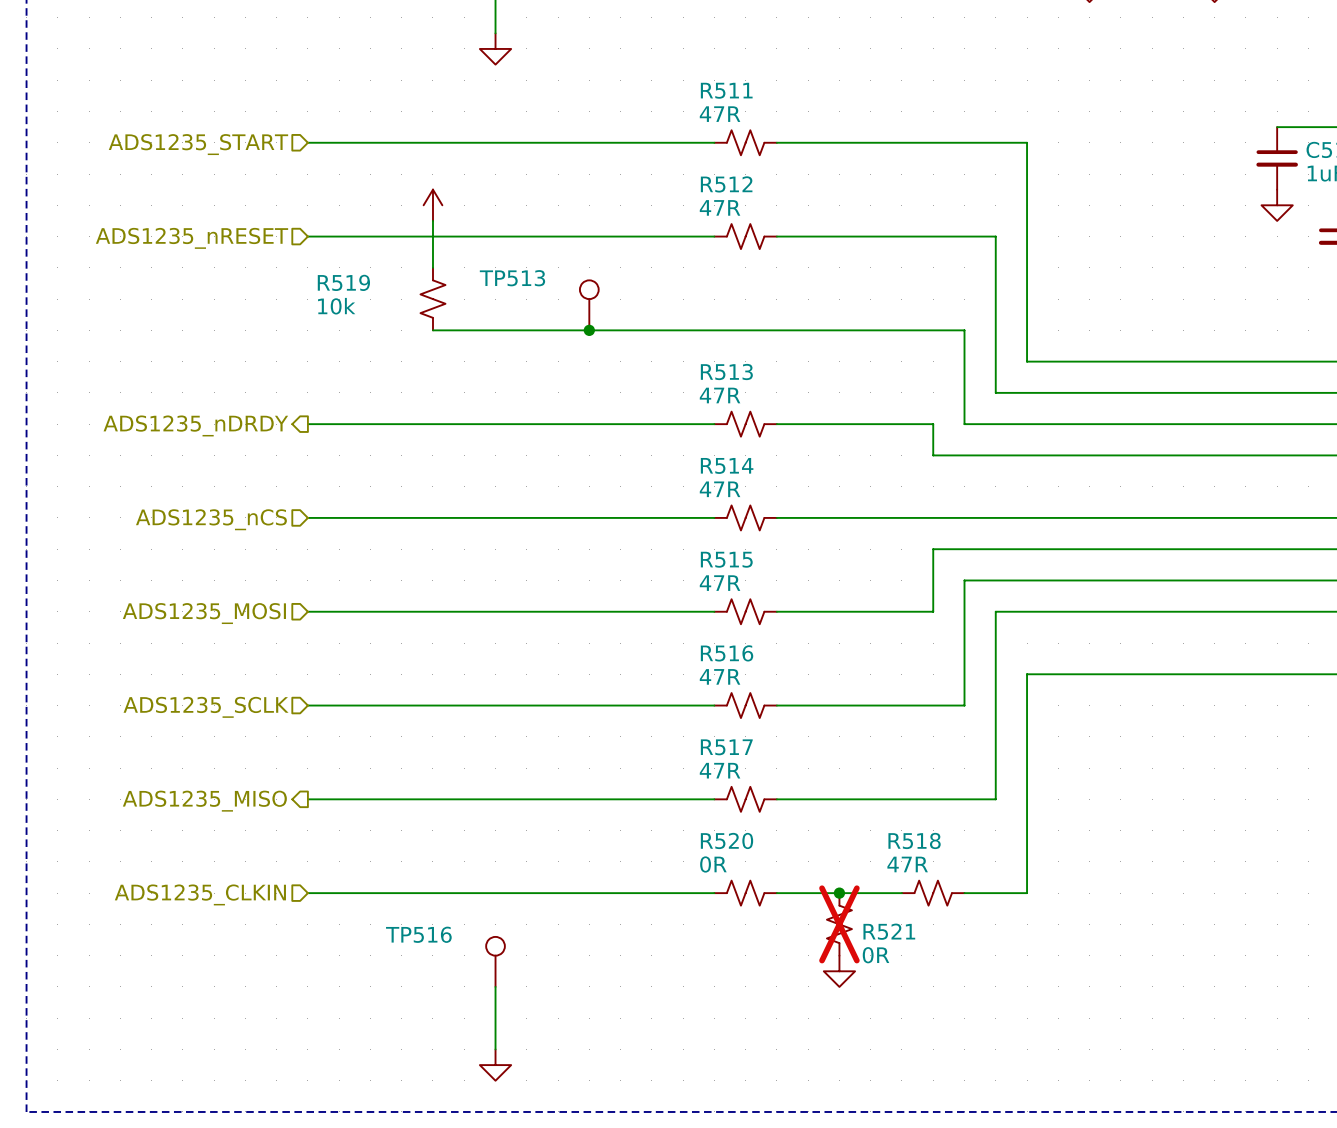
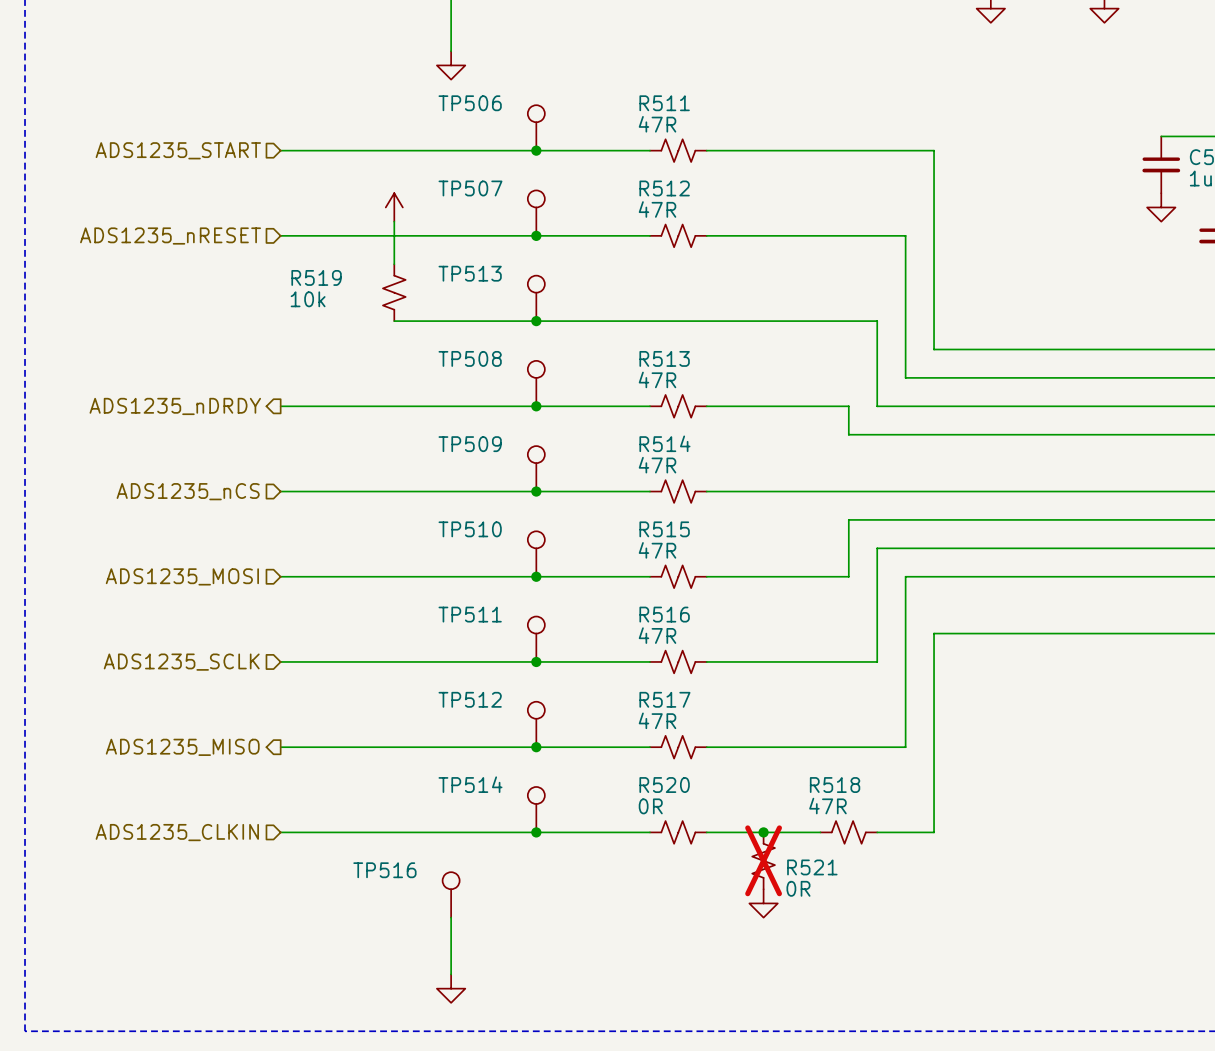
TP506: none -> (536, 127)
junction: none -> (536, 150)
TP507: none -> (536, 213)
junction: none -> (536, 235)
TP508: none -> (536, 383)
junction: none -> (536, 406)
TP509: none -> (536, 468)
junction: none -> (536, 491)
TP510: none -> (536, 554)
junction: none -> (536, 576)
TP511: none -> (536, 639)
junction: none -> (536, 661)
TP512: none -> (536, 724)
junction: none -> (536, 747)
TP514: none -> (536, 809)
junction: none -> (536, 832)

